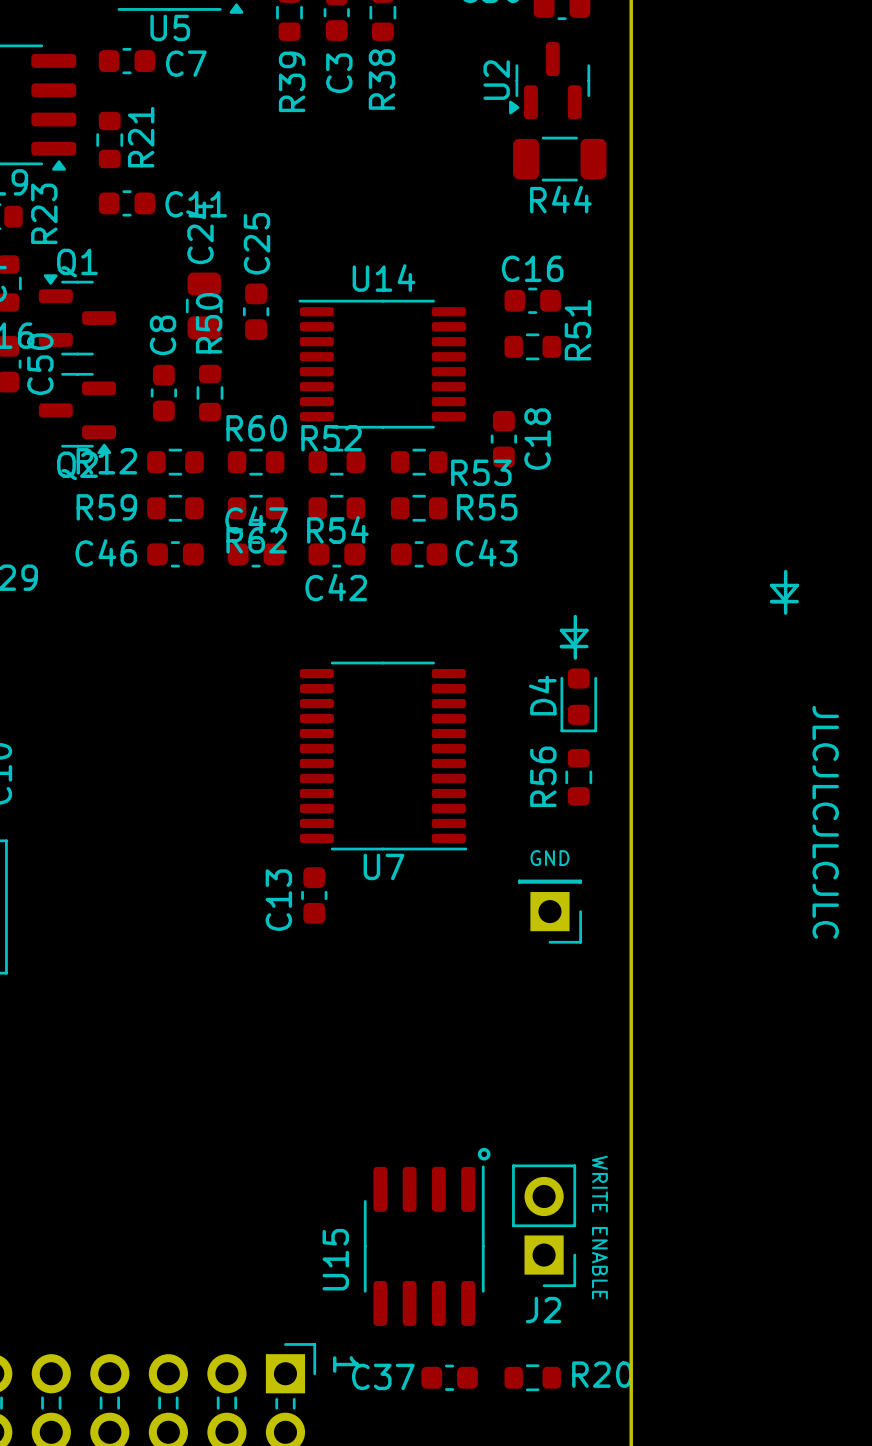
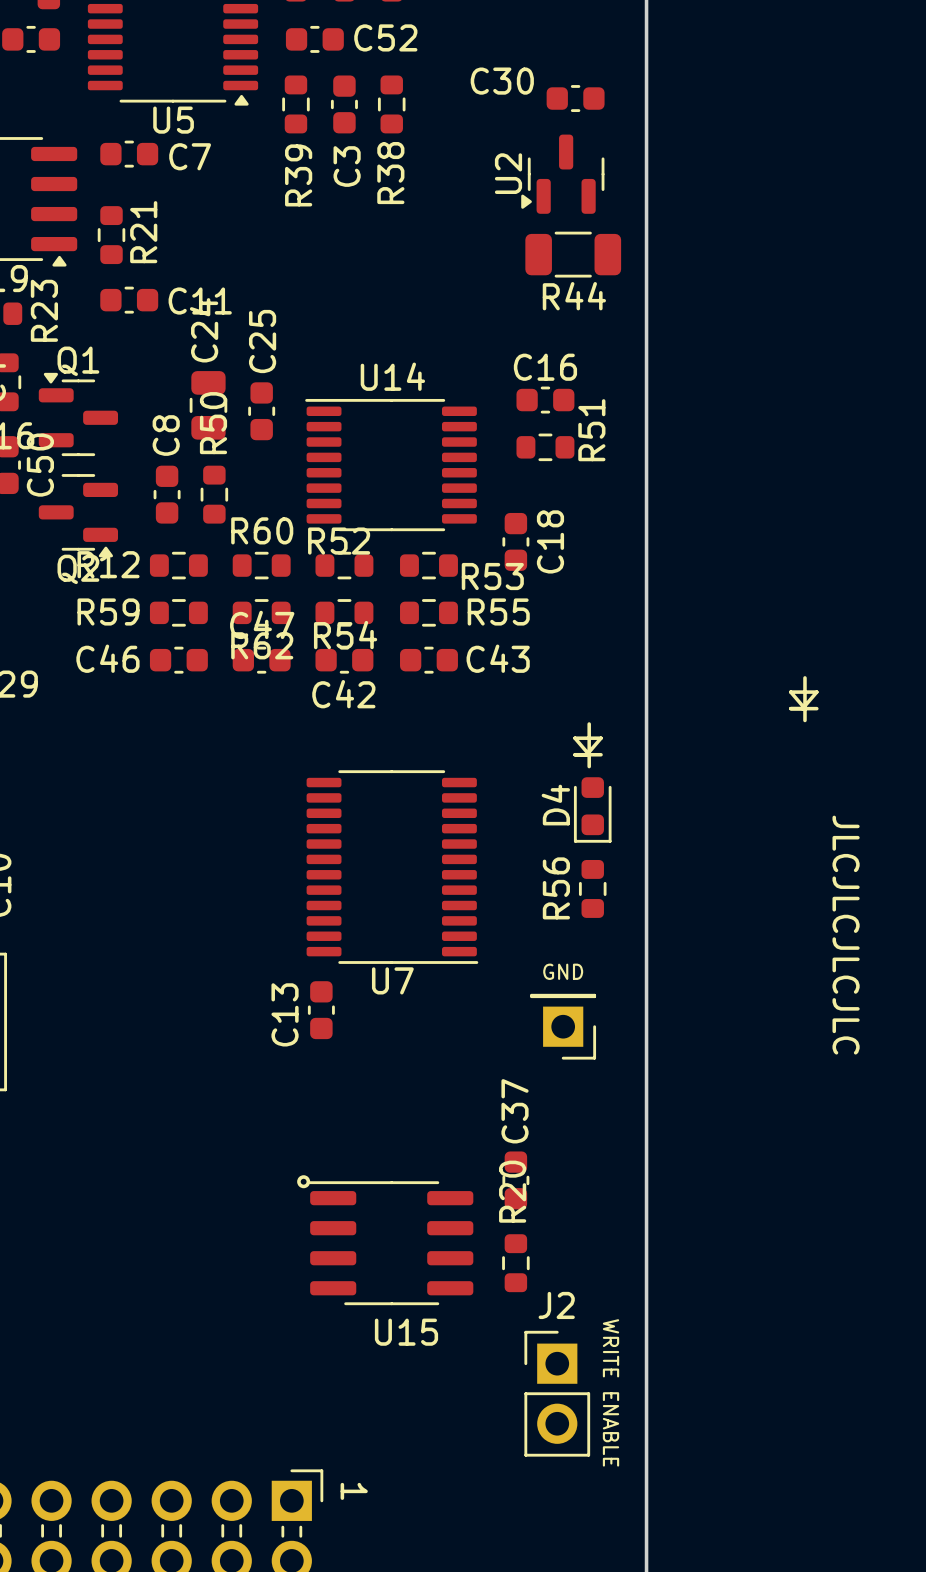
drawing position: (484, 1154) -> (303, 1181)
J2 rotation: 0° (544, 1225) -> 180° (557, 1393)
text position: WRITE ENABLE (599, 1227) -> WRITE ENABLE (611, 1392)
U15 rotation: 0° (424, 1245) -> 90° counterclockwise (391, 1243)
U15 position: (424, 1245) -> (391, 1243)
R20 name position: R20 (602, 1374) -> R20 (512, 1191)
C37 rotation: 0° (449, 1377) -> 90° clockwise (515, 1180)
C37 position: (449, 1377) -> (515, 1180)
R20 rotation: 0° (532, 1377) -> 90° clockwise (515, 1263)
R20 position: (532, 1377) -> (515, 1263)

